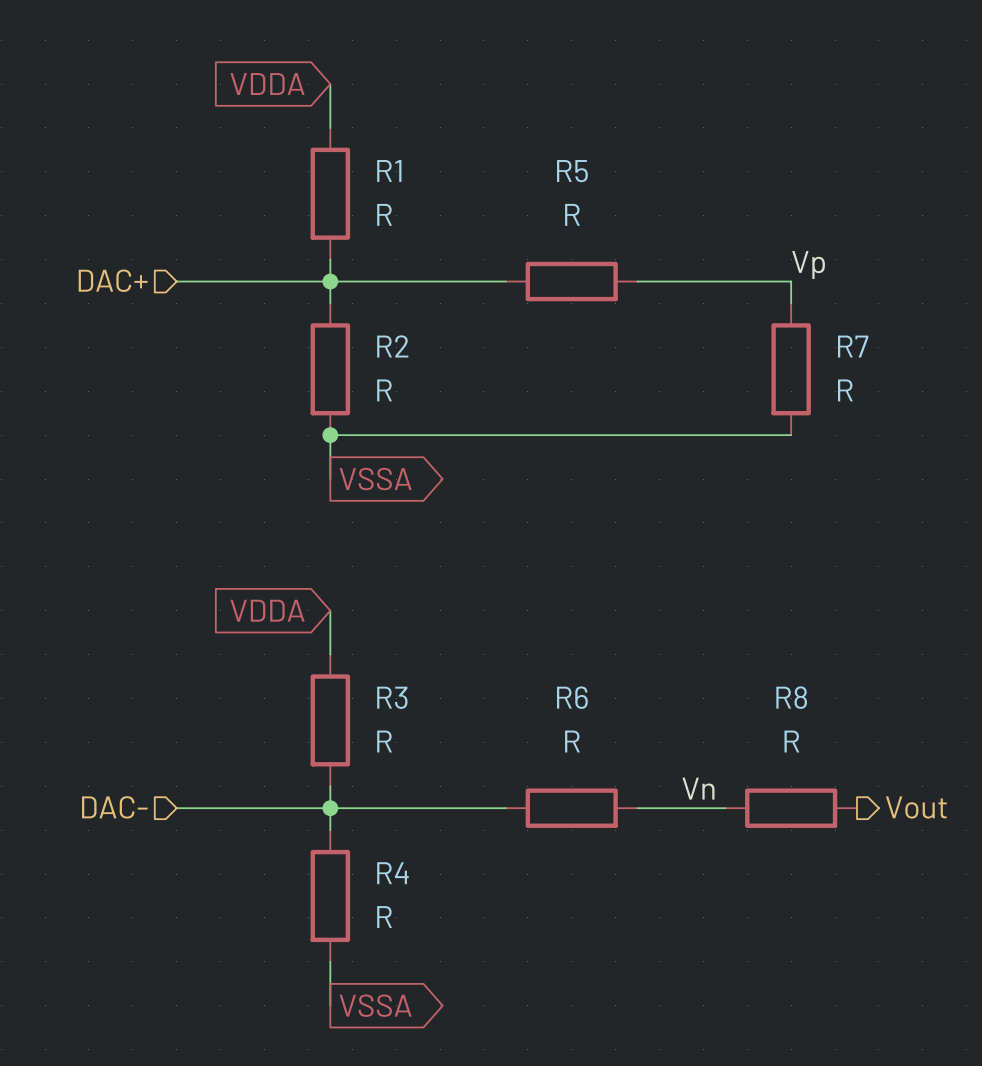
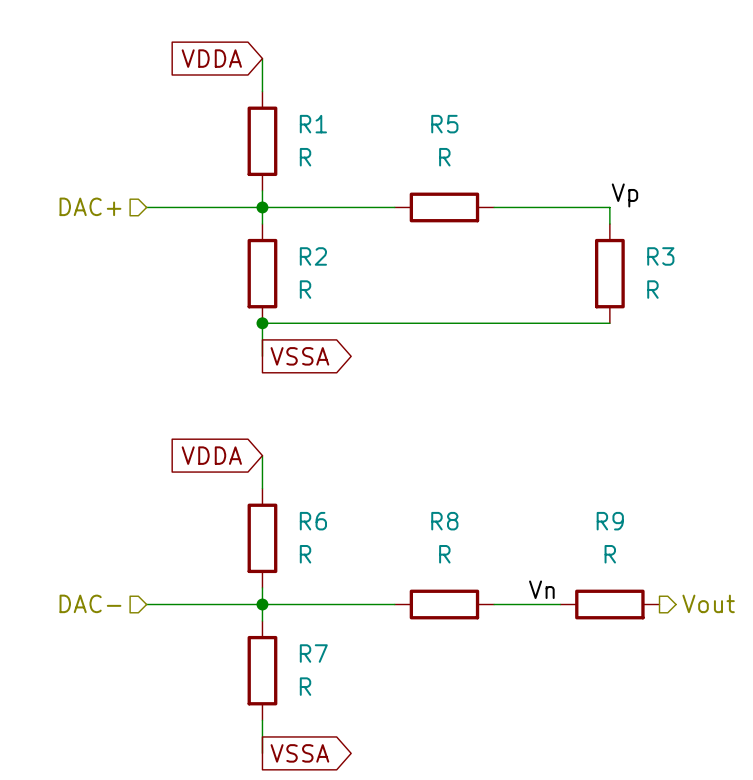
R7 name: R7 (853, 346) -> R3 (660, 256)
R3 name: R3 (392, 697) -> R6 (313, 521)
R6 name: R6 (572, 697) -> R8 (444, 521)
R8 name: R8 (791, 697) -> R9 (610, 521)
R4 name: R4 (392, 873) -> R7 (313, 653)

